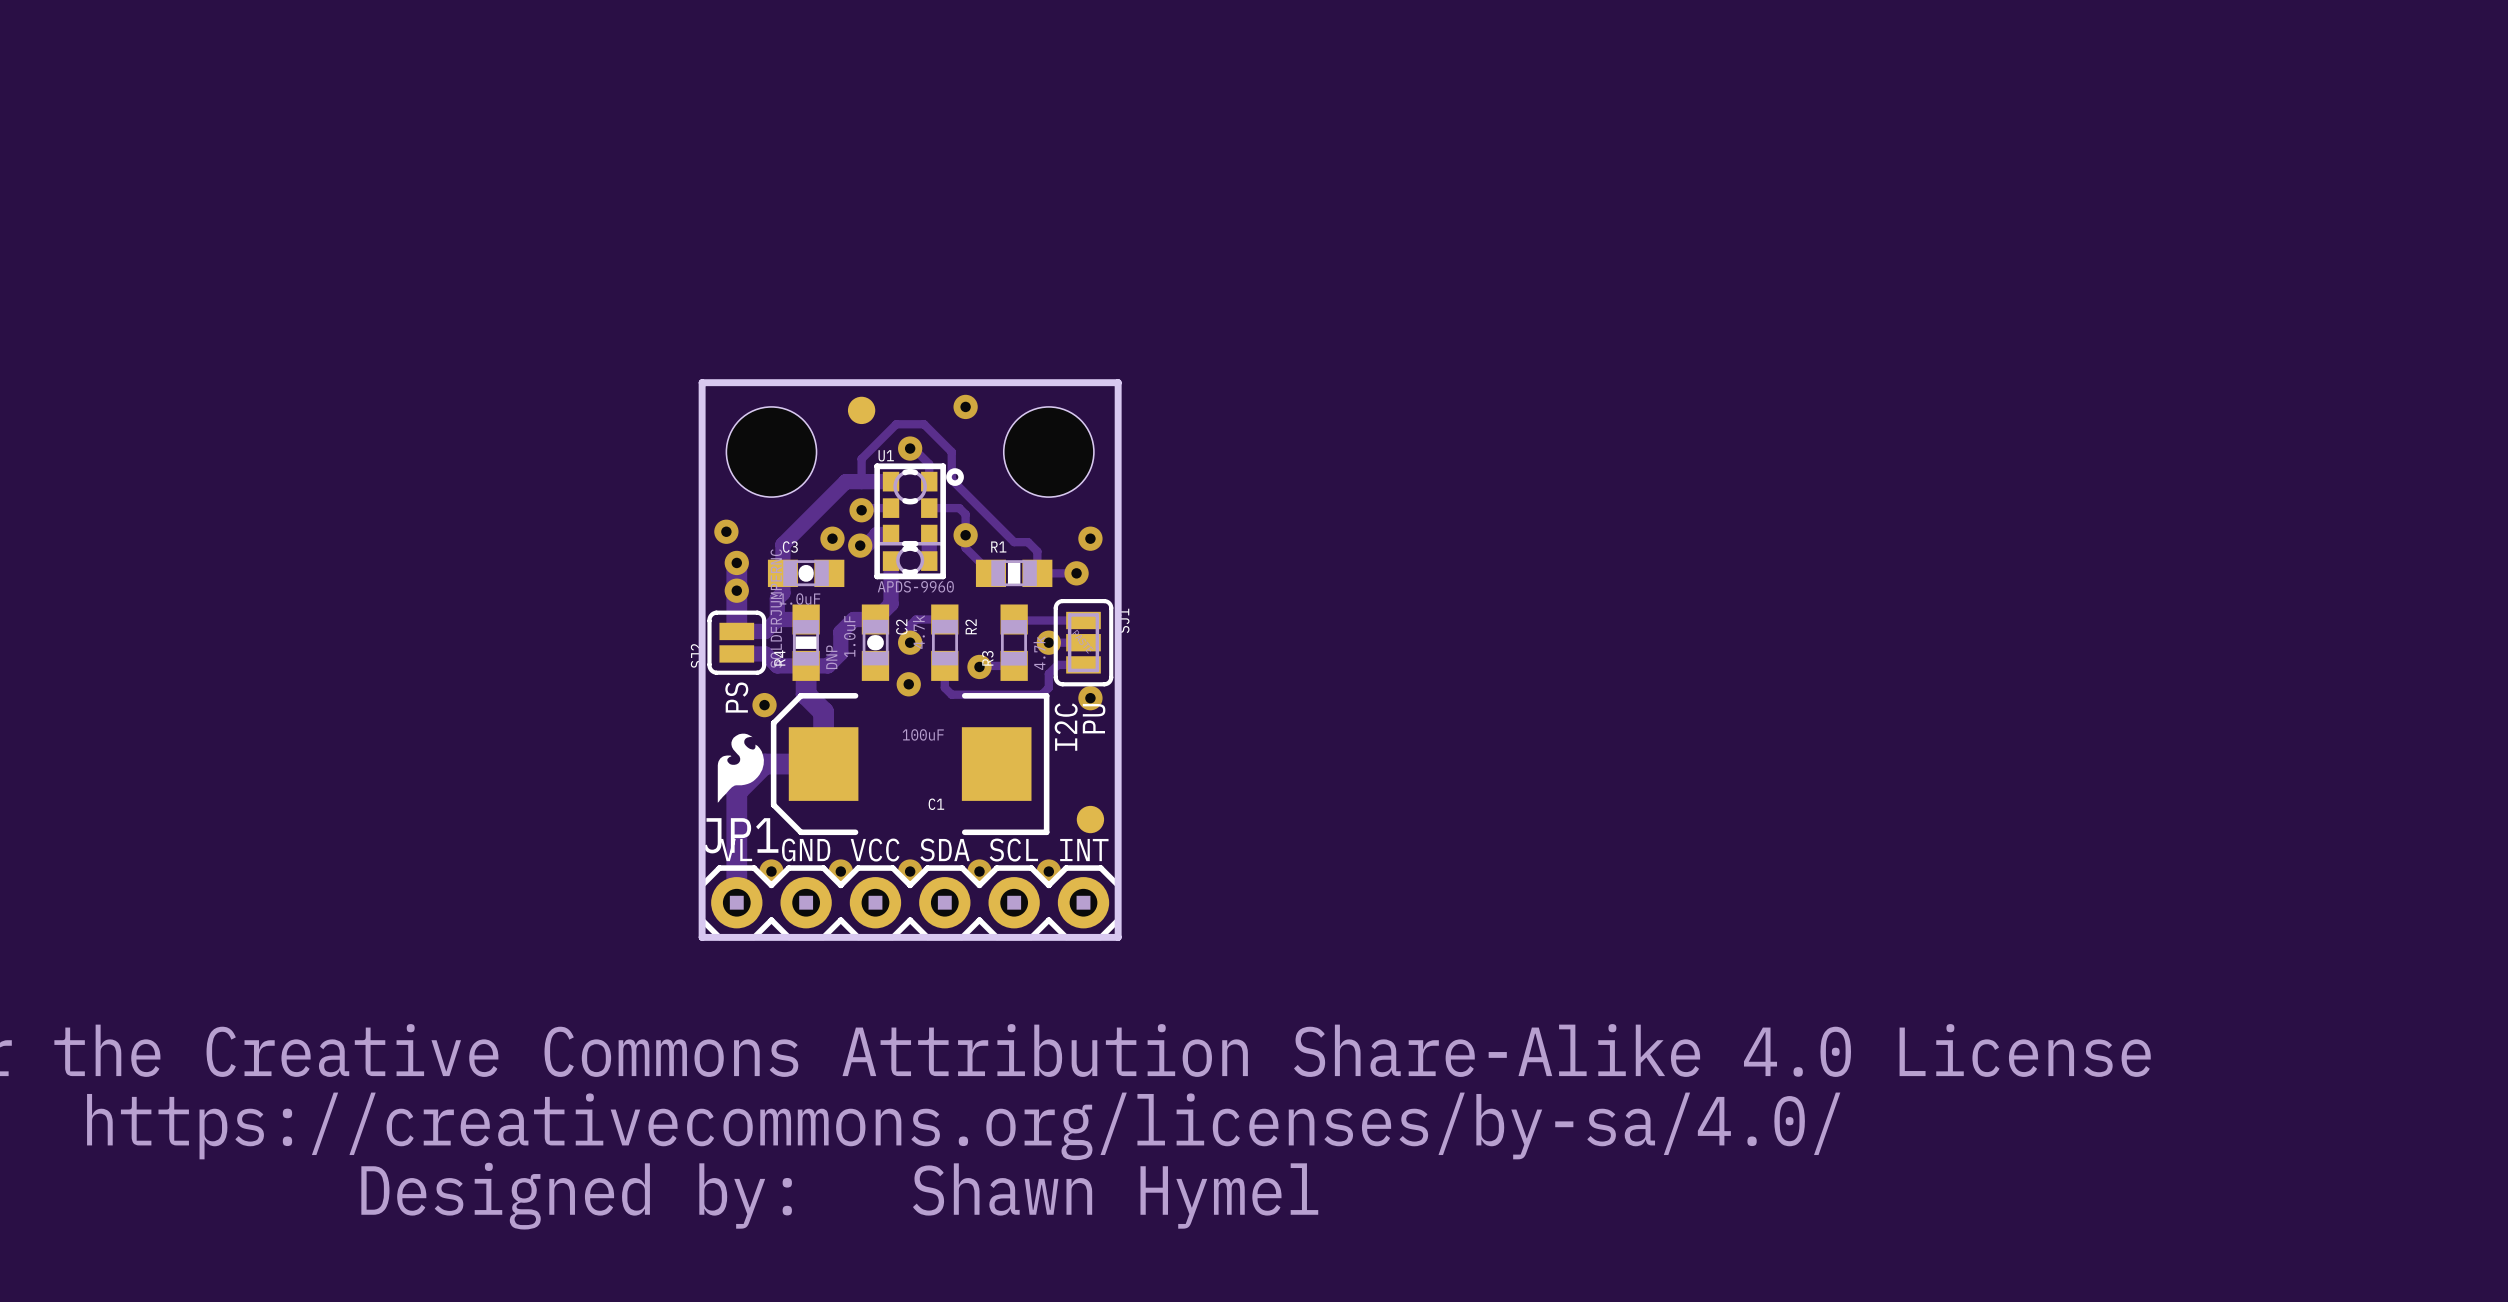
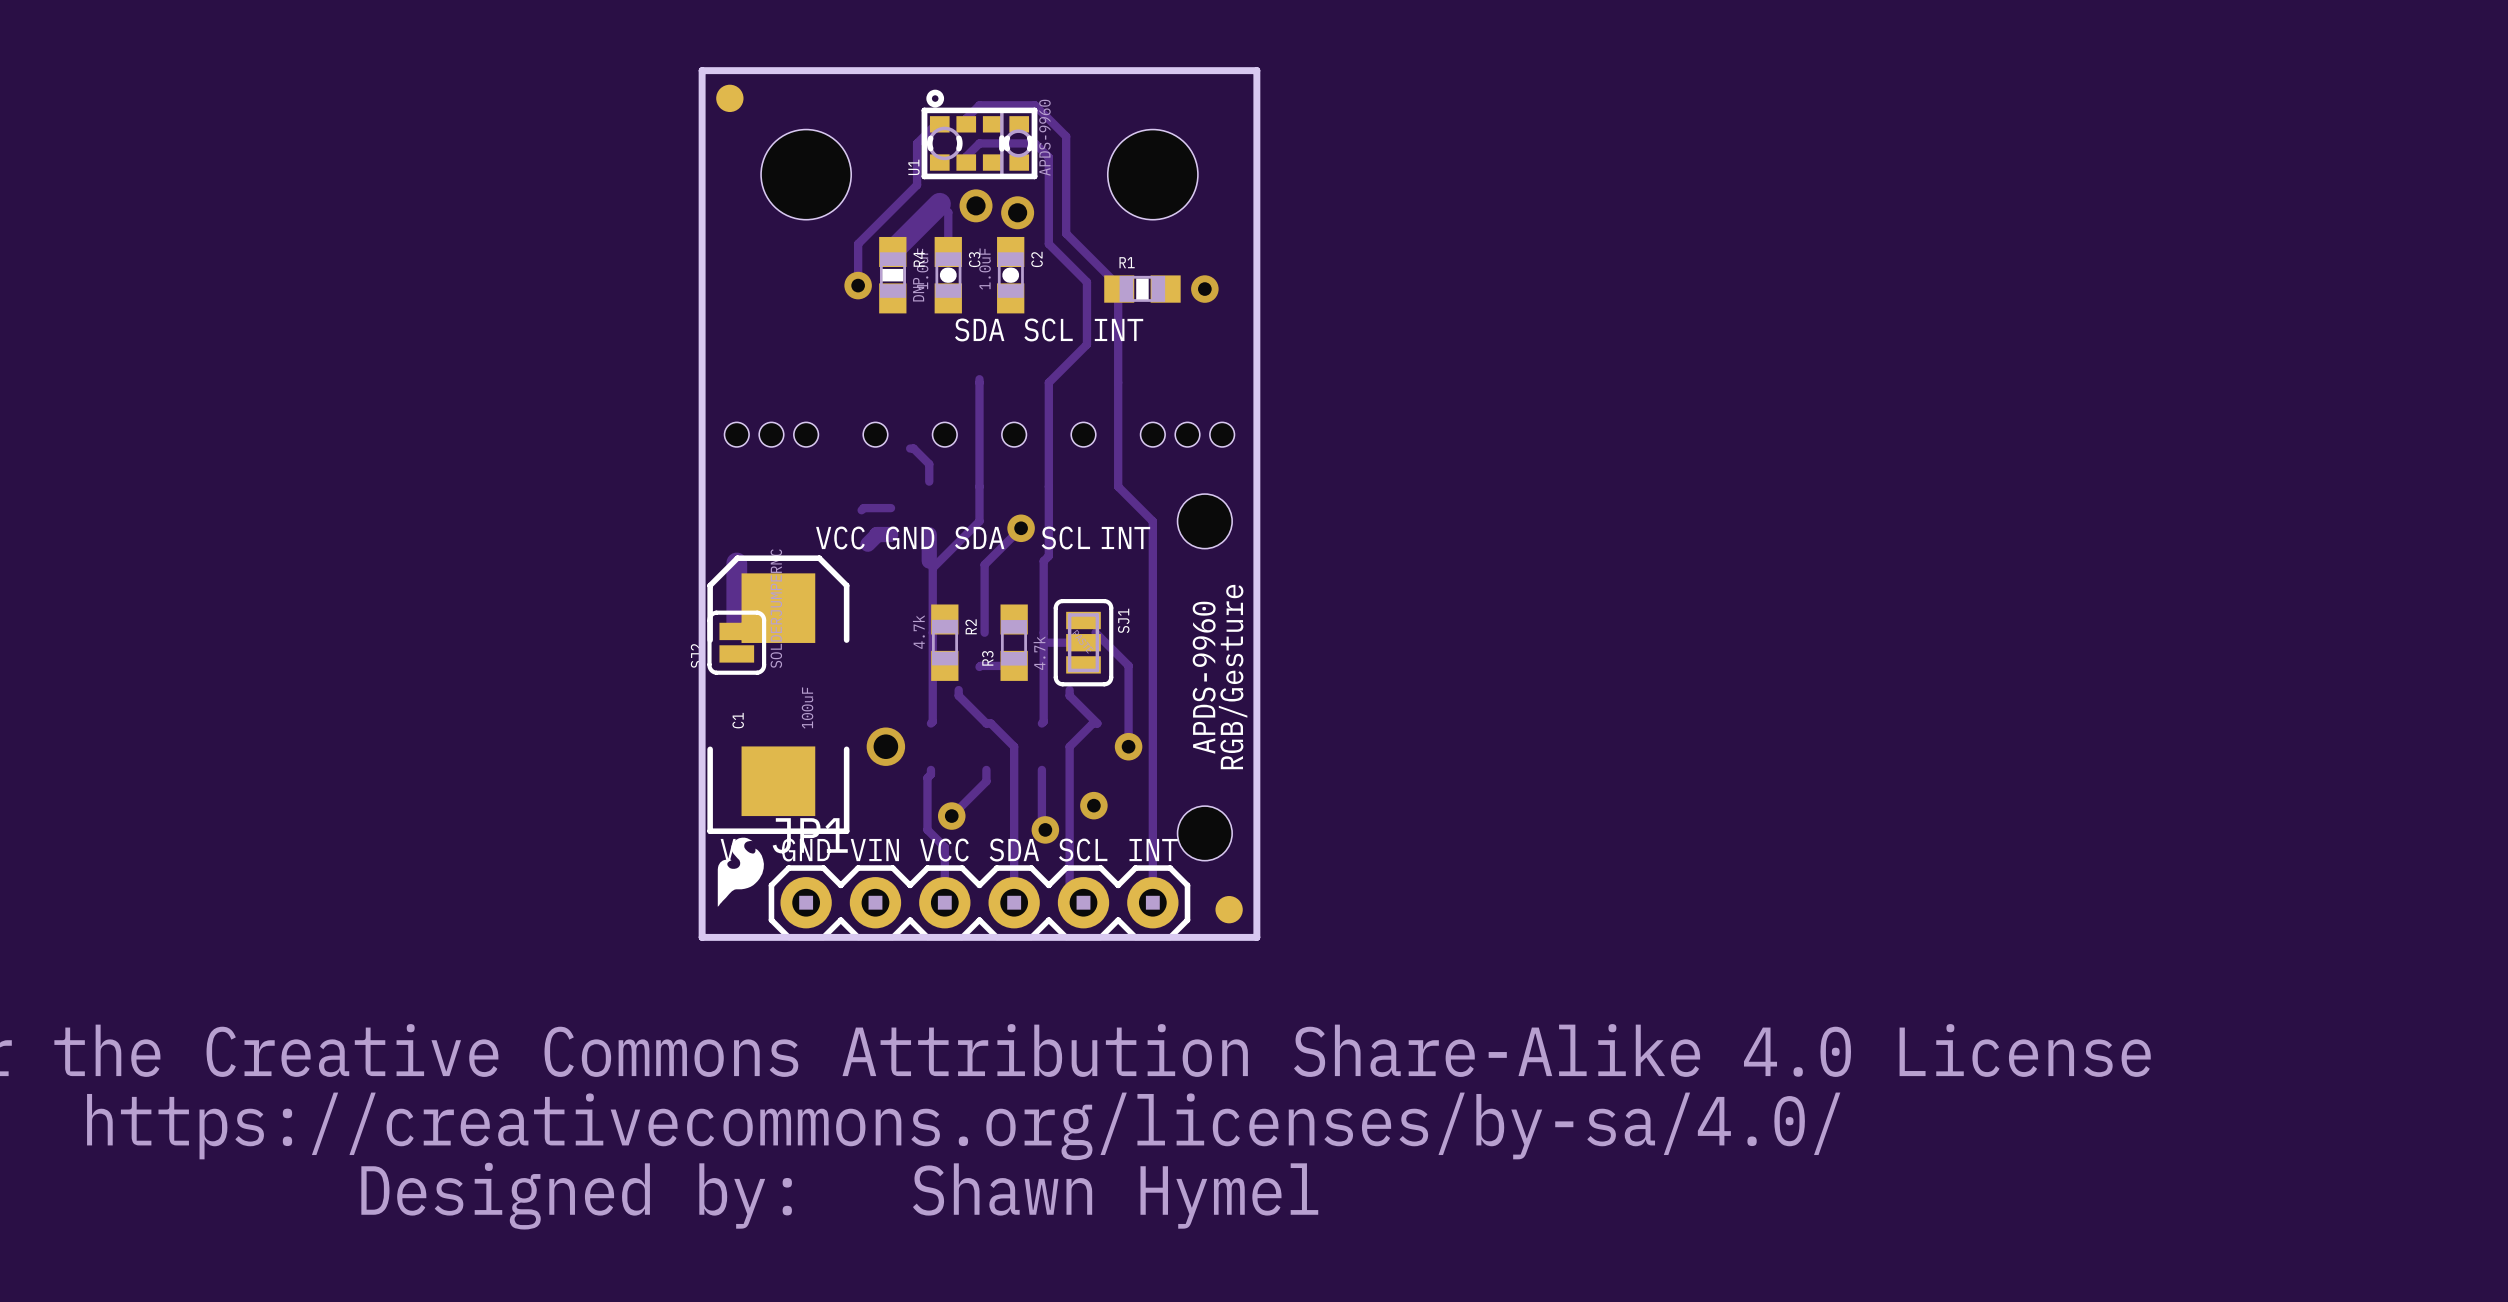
part: none -> (729, 98)
track: none -> (939, 124) (936, 124) (917, 143) (917, 185) (858, 243) (858, 285)
track: none -> (966, 124) (966, 118) (979, 105) (1034, 105) (1066, 136) (1066, 233) (1118, 285) (1119, 289) (1118, 486) (1152, 521) (1152, 902)
track: none -> (966, 162) (966, 156) (979, 143) (1034, 143) (1048, 157) (1048, 243) (1086, 282) (1086, 344) (1048, 382) (1048, 556) (1043, 561) (1043, 721) (1041, 723)
part: none -> (806, 174)
part: none -> (1152, 174)
via: none -> (976, 205)
via: none -> (1017, 212)
track: none -> (892, 251) (939, 203) (948, 212) (948, 251)
via: none -> (858, 285)
via: none -> (1204, 289)
text: none -> SDA (979, 329)
text: none -> SCL (1048, 329)
text: none -> INT (1119, 329)
track: none -> (979, 379) (979, 521) (932, 568) (932, 721) (930, 723)
board edge: (702, 382) (1118, 382) (1118, 937) -> (702, 382) (702, 70) (1256, 70) (1256, 937) (1118, 937)
via: (965, 406) -> none
part: (861, 410) -> none
hole: none -> (736, 434)
hole: none -> (771, 434)
hole: none -> (806, 434)
hole: none -> (875, 434)
hole: none -> (944, 434)
hole: none -> (1014, 434)
hole: none -> (1083, 434)
hole: none -> (1152, 434)
hole: none -> (1187, 434)
hole: none -> (1222, 434)
via: (910, 448) -> none
part: (771, 452) -> none
part: (1048, 452) -> none
track: (861, 481) (861, 458) (896, 424) (924, 424) (951, 452) (951, 479) (1014, 542) (1028, 542) (1037, 551) (1037, 573) (1076, 573) -> none
track: (891, 481) (845, 481) (782, 544) (782, 593) (777, 598) (777, 619) -> none
track: (929, 508) (959, 508) (965, 514) (965, 548) (990, 573) -> none
via: (861, 510) -> none
U1 rotation: 0° (919, 521) -> 90° counterclockwise (979, 134)
U1 position: (919, 521) -> (979, 134)
hole: none -> (1204, 521)
track: none -> (1021, 528) (984, 564) (984, 632)
via: none -> (1021, 528)
via: (726, 531) -> none
via: (965, 535) -> none
text: none -> VCC (840, 537)
text: none -> GND (910, 537)
text: none -> SDA (979, 537)
text: none -> SCL (1065, 537)
text: none -> INT (1125, 537)
via: (832, 538) -> none
via: (1090, 538) -> none
via: (860, 545) -> none
track: (891, 561) (891, 603) (875, 619) (853, 619) (840, 632) (840, 653) (828, 665) (777, 665) (765, 653) (736, 653) -> none
via: (736, 562) -> none
C3 rotation: 0° (806, 573) -> 90° clockwise (948, 275)
C3 position: (806, 573) -> (948, 275)
R1 position: (1014, 573) -> (1142, 289)
via: (1076, 573) -> none
via: (736, 590) -> none
track: (944, 619) (916, 619) (910, 625) (910, 642) -> none
track: (1014, 619) (1083, 620) -> none
track: none -> (1095, 632) (1128, 665) (1128, 746)
R4 position: (806, 642) -> (892, 275)
C2 position: (875, 642) -> (1010, 275)
via: (910, 642) -> none
via: (1048, 642) -> none
R4 name position: R4 (779, 658) -> R4 (919, 259)
track: (1083, 664) (1057, 664) (1048, 673) (1048, 687) (1041, 694) (951, 694) (944, 687) (944, 665) -> none
track: (806, 665) (806, 694) (823, 712) (823, 764) (764, 764) (736, 791) (736, 902) -> none
via: (979, 666) -> none
text: none -> APDS-9960 (1204, 677)
text: none -> RGB/Gesture (1233, 677)
via: (908, 684) -> none
track: none -> (958, 690) (958, 695) (986, 723) (990, 723) (1014, 746) (1014, 902)
track: none -> (1069, 690) (1069, 695) (1097, 723) (1092, 723) (1069, 746) (1069, 888) (1083, 902)
text: PS (736, 697) -> none
via: (1090, 698) -> none
via: (764, 705) -> none
text: PU (1094, 718) -> none
text: I2C (1066, 727) -> none
via: none -> (885, 746)
via: none -> (1128, 746)
C1 rotation: 0° (910, 764) -> 90° clockwise (778, 694)
drawing position: (740, 768) -> (740, 872)
track: none -> (930, 769) (930, 774) (927, 777) (927, 829) (944, 847) (944, 902)
track: none -> (986, 769) (986, 781) (951, 816)
track: none -> (1041, 769) (1041, 826) (1045, 829)
via: none -> (1093, 805)
via: none -> (951, 816)
part position: (1090, 819) -> (1229, 909)
via: none -> (1045, 829)
hole: none -> (1204, 833)
text: VCC (875, 850) -> VIN (874, 850)
text: SDA (945, 850) -> VCC (944, 850)
text: SCL (1013, 850) -> SDA (1014, 850)
text: INT (1084, 850) -> SCL (1083, 850)
text: none -> INT (1153, 850)
via: (771, 871) -> none
via: (840, 871) -> none
via: (910, 871) -> none
via: (979, 871) -> none
via: (1048, 871) -> none
JP1 position: (910, 902) -> (979, 902)

